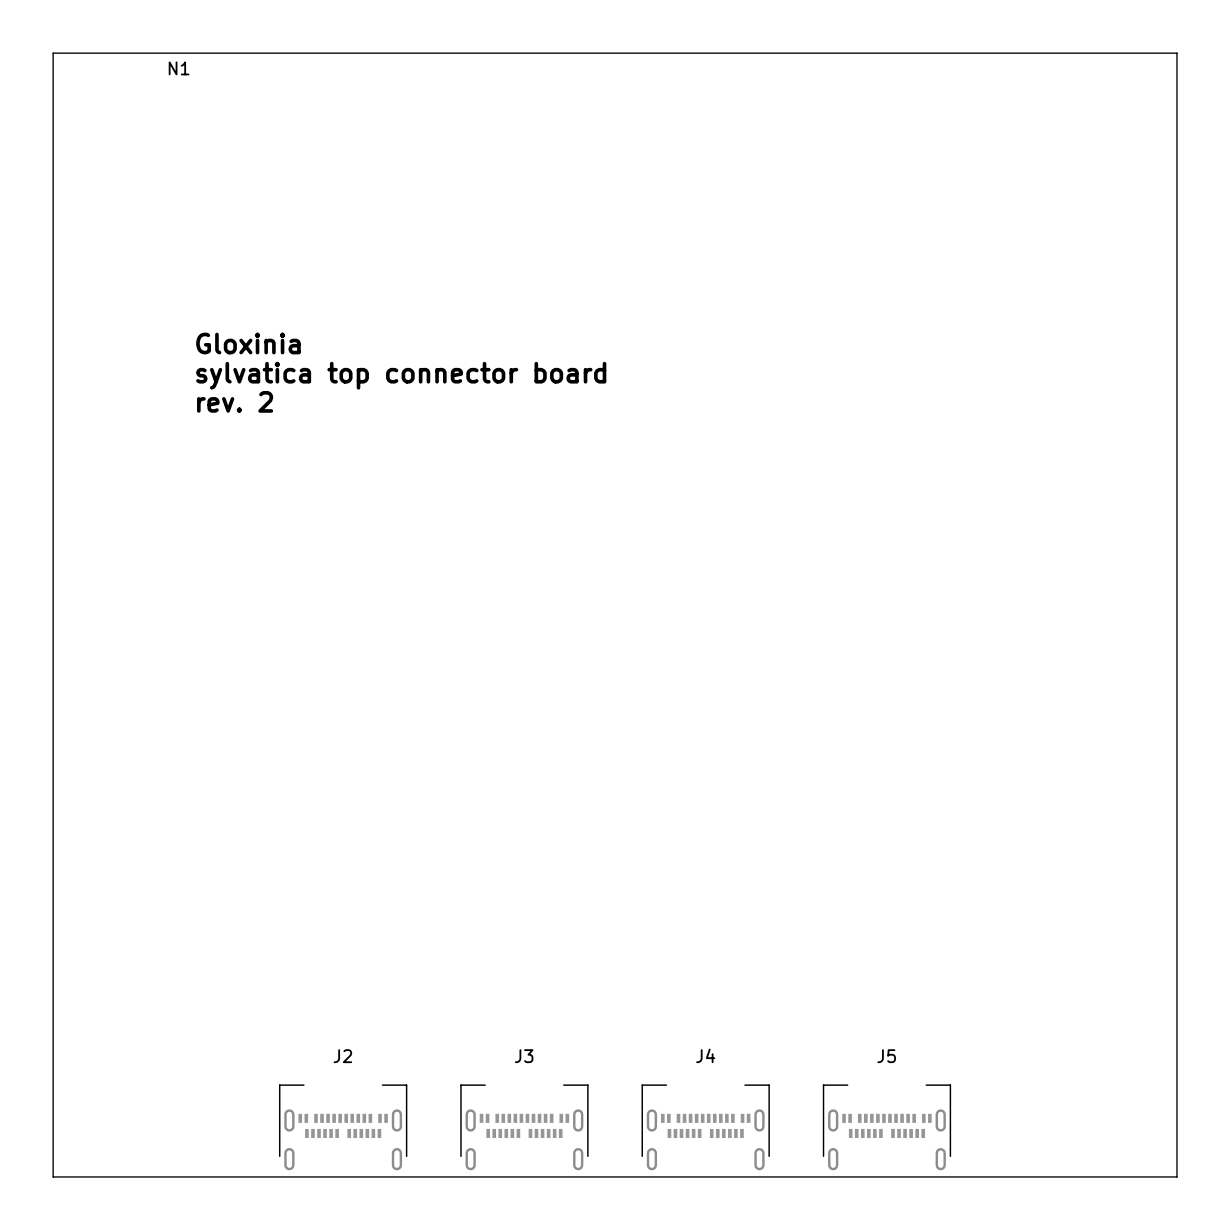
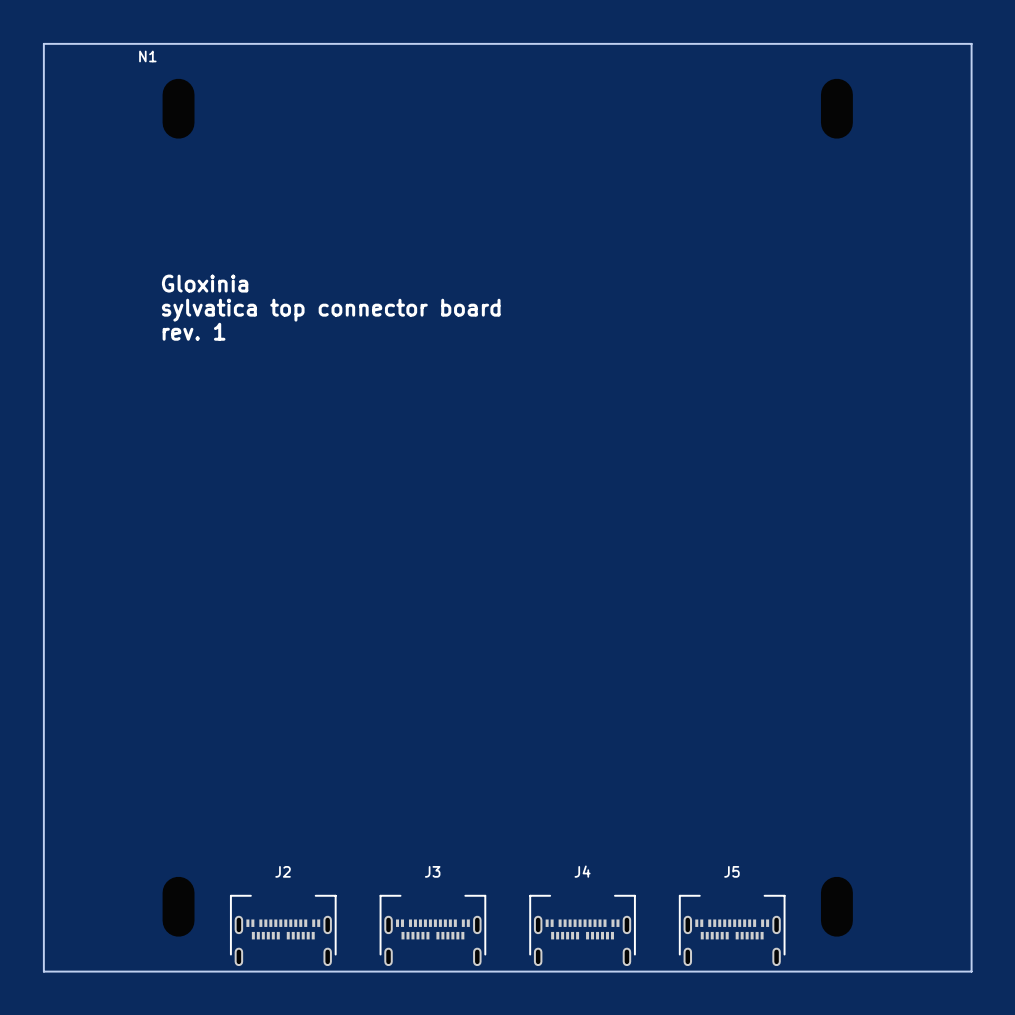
text: rev. 2 (235, 401) -> rev. 1 (194, 331)

